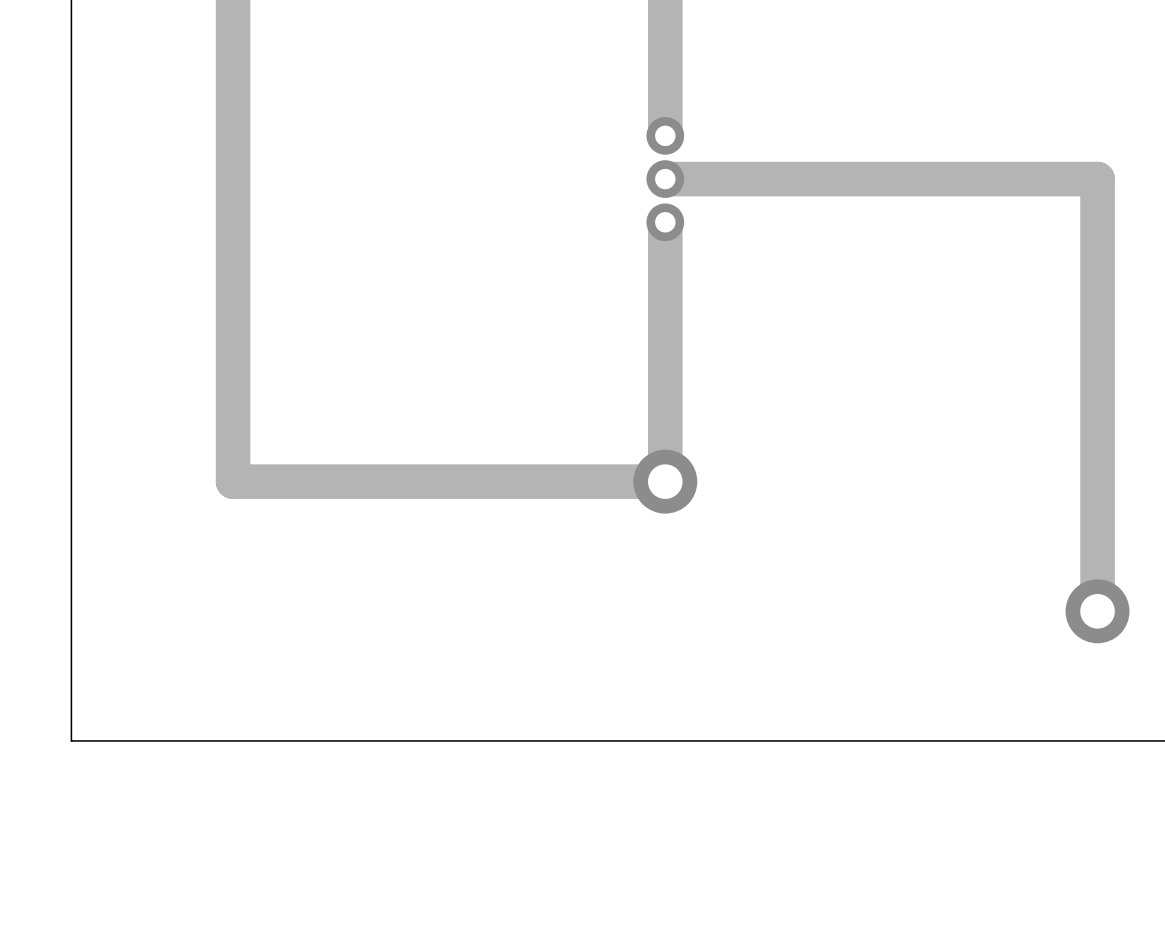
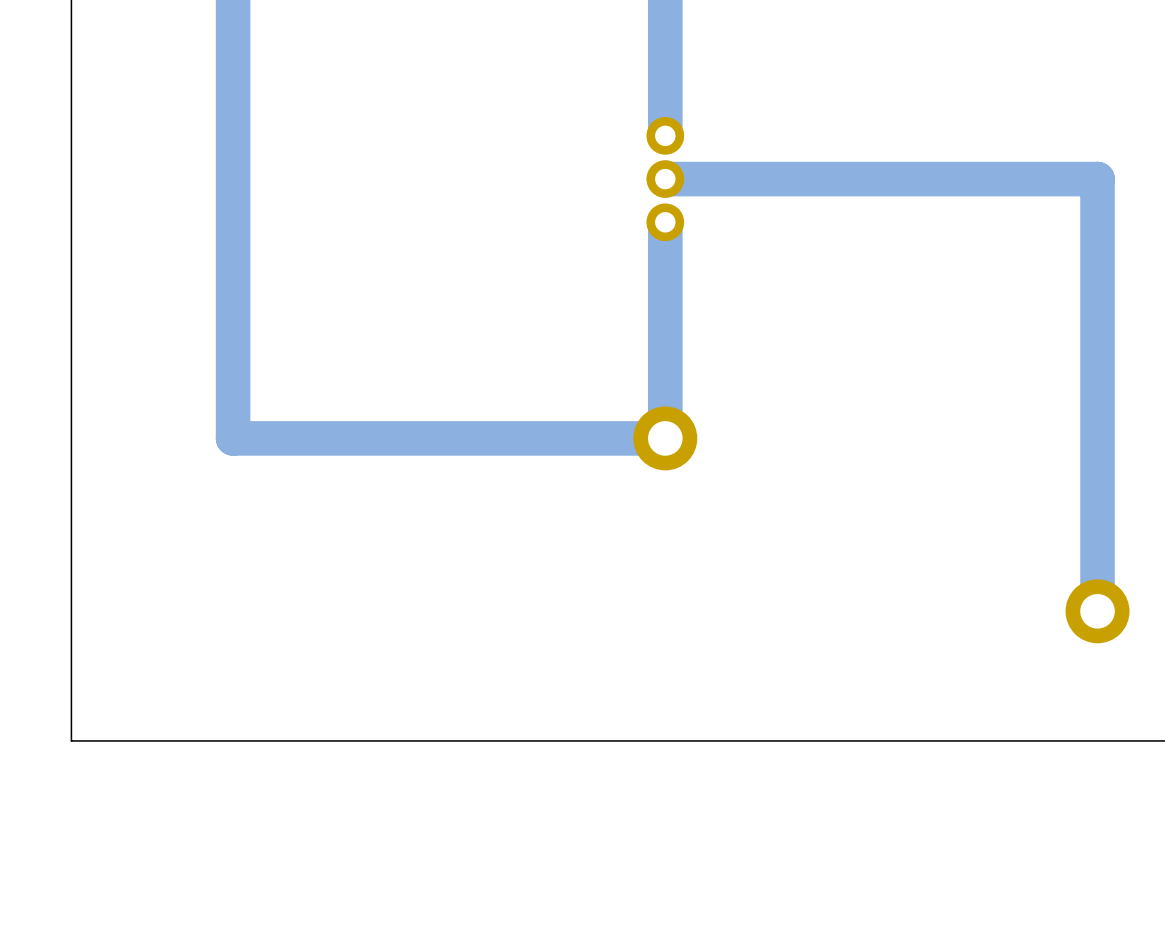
track: (665, 438) (665, 481) (233, 481) (233, 438) -> (665, 438) (233, 438)
part position: (665, 481) -> (665, 438)

